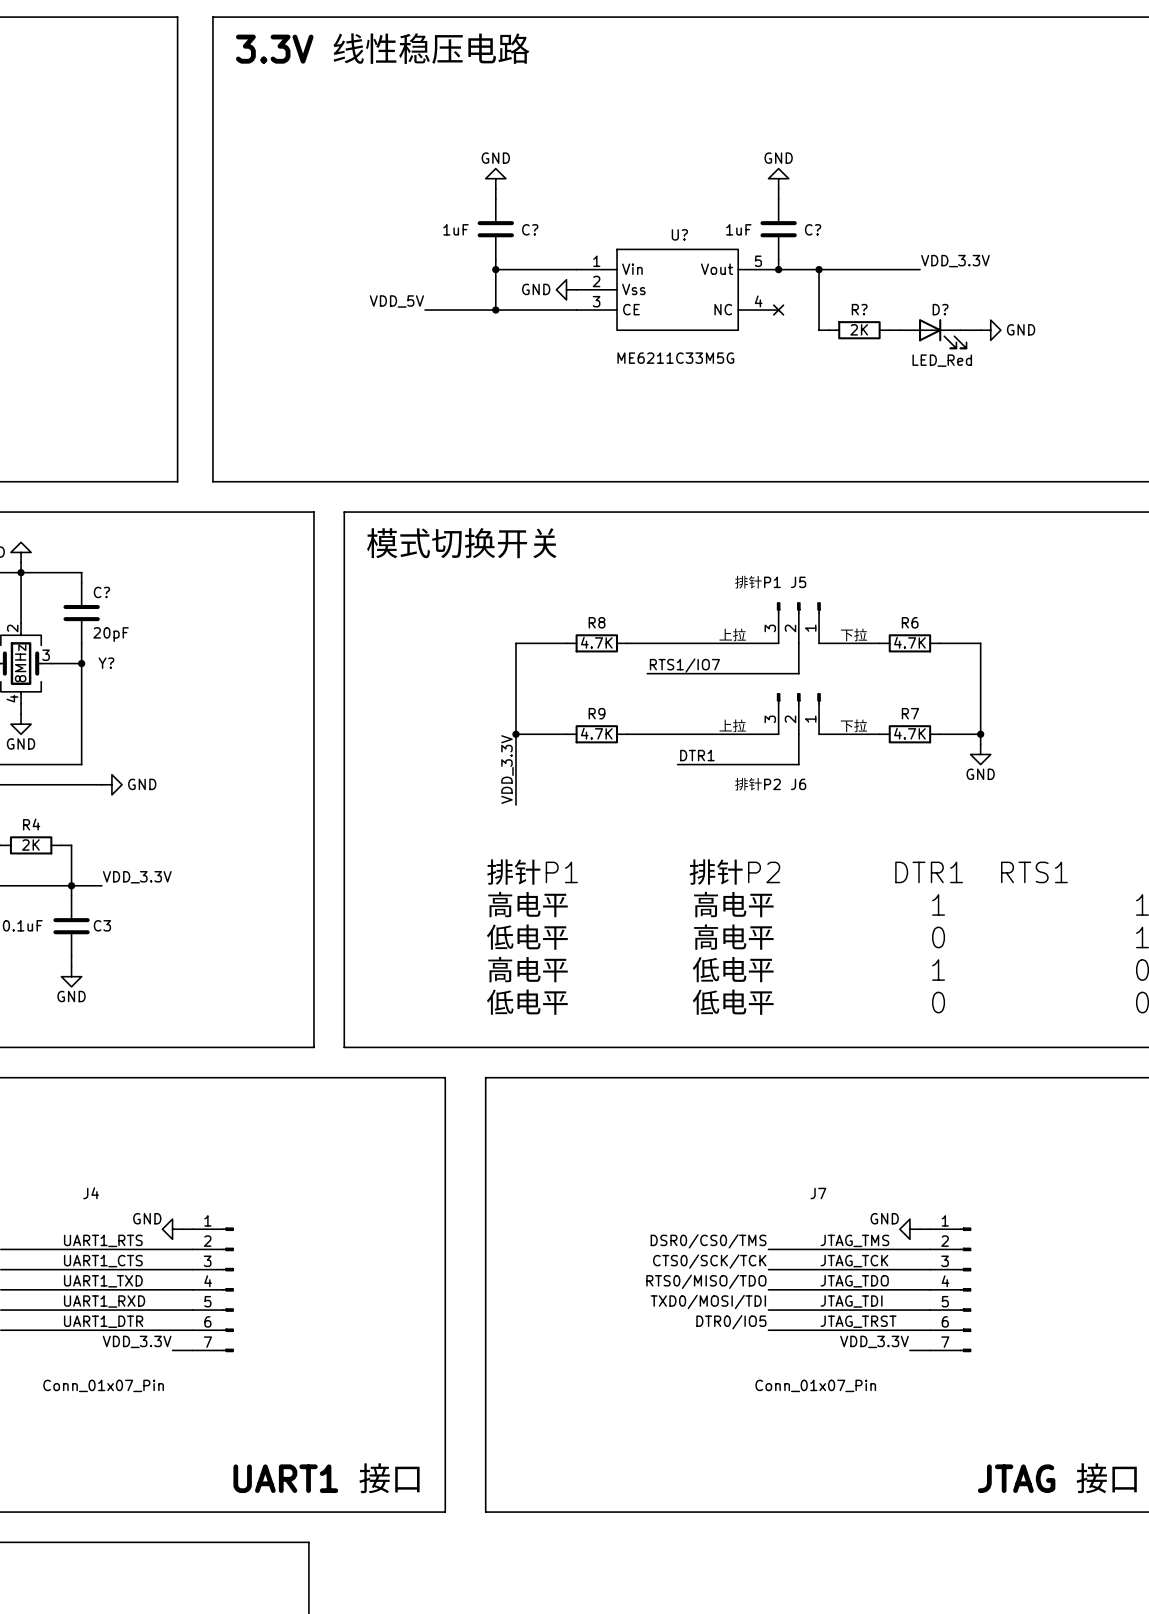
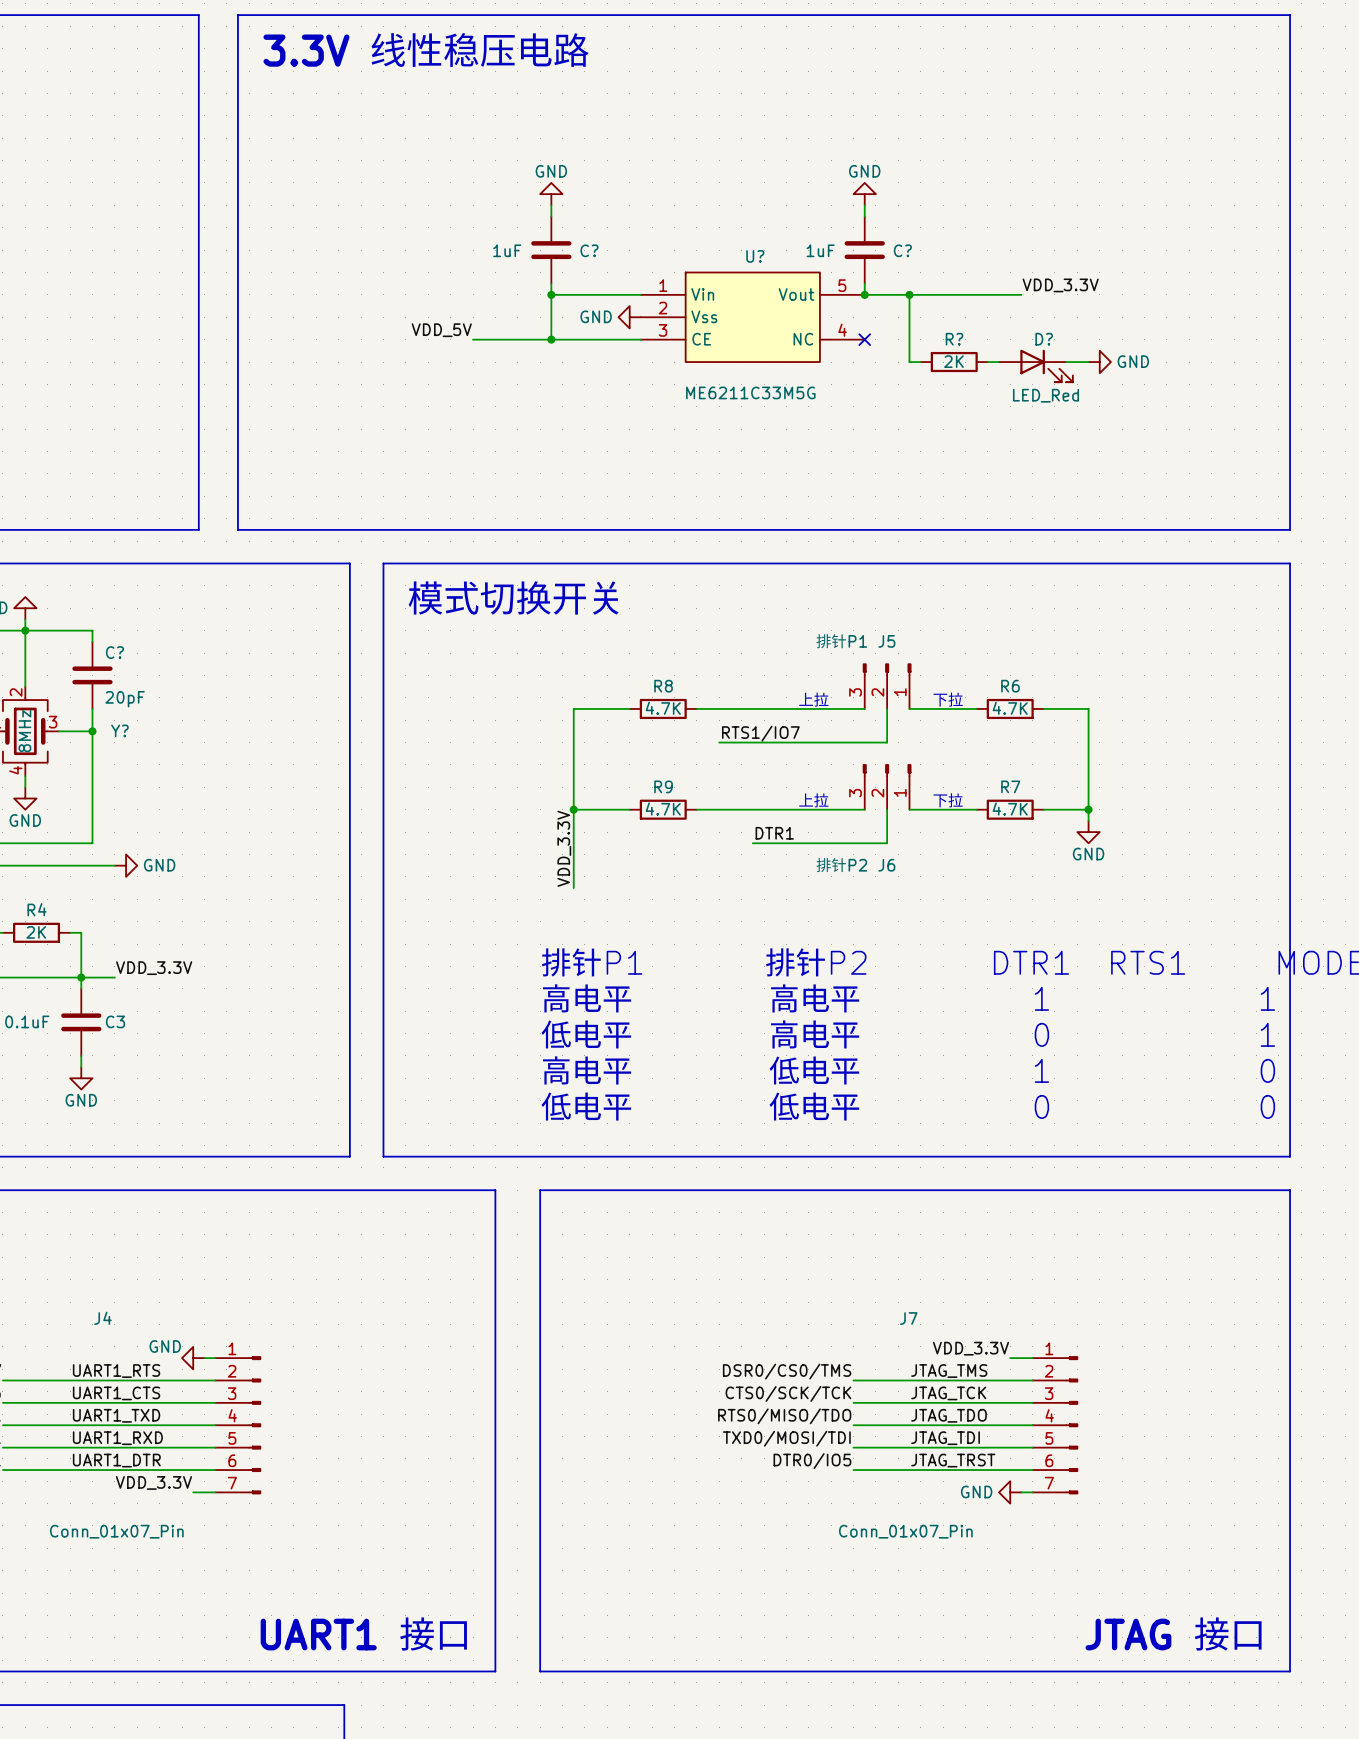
power symbol text position: GND (884, 1218) -> GND (976, 1491)
power symbol position: GND (909, 1229) -> GND (1010, 1492)
label position: VDD_3.3V (874, 1341) -> VDD_3.3V (970, 1348)

